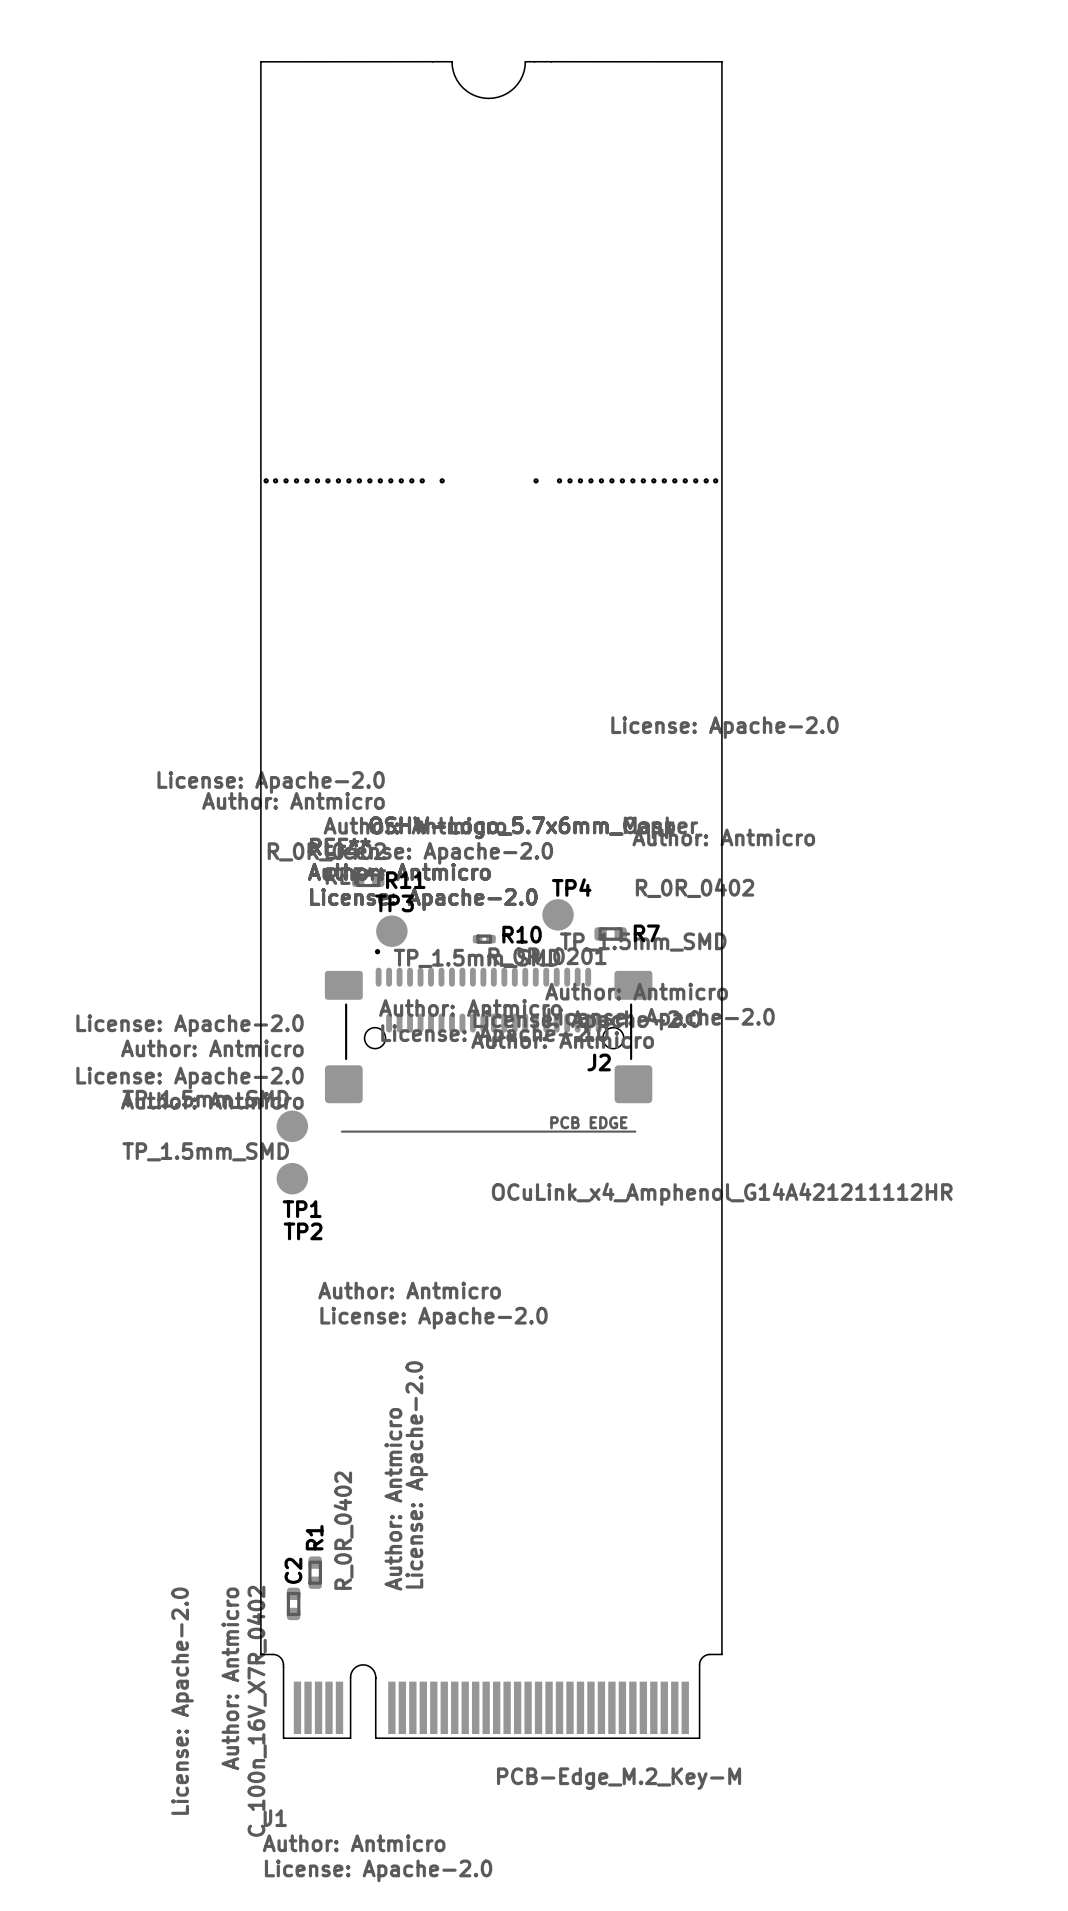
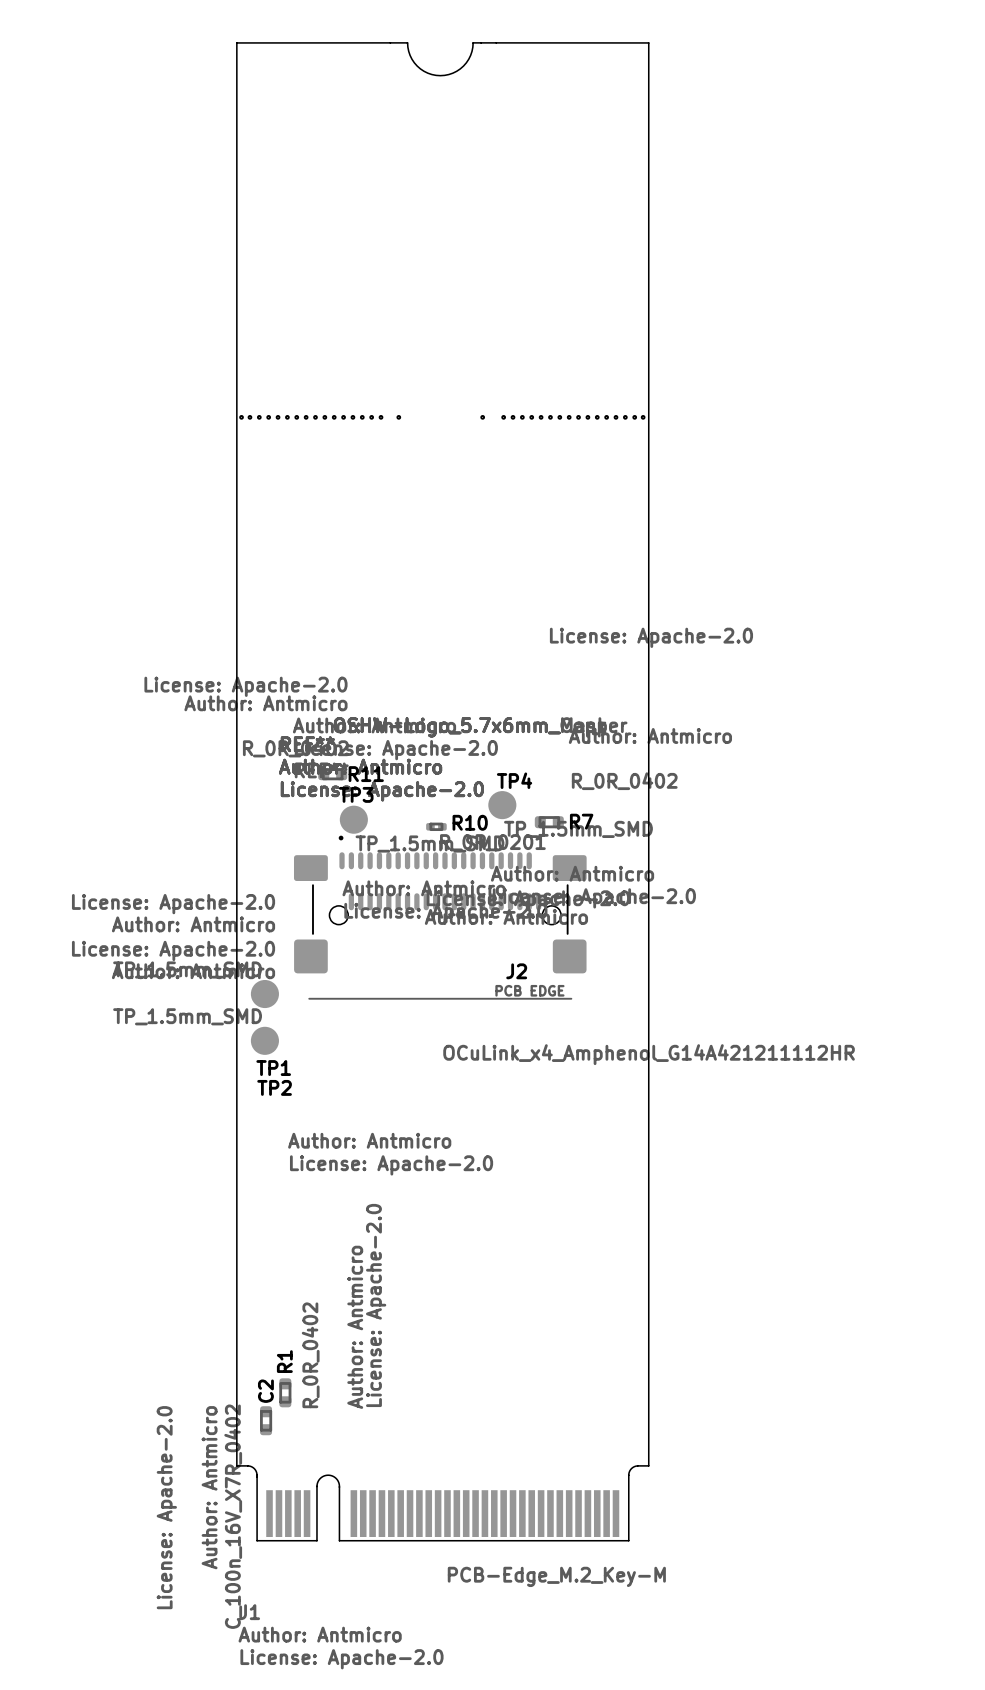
J2 name position: J2 (599, 1062) -> J2 (516, 971)

